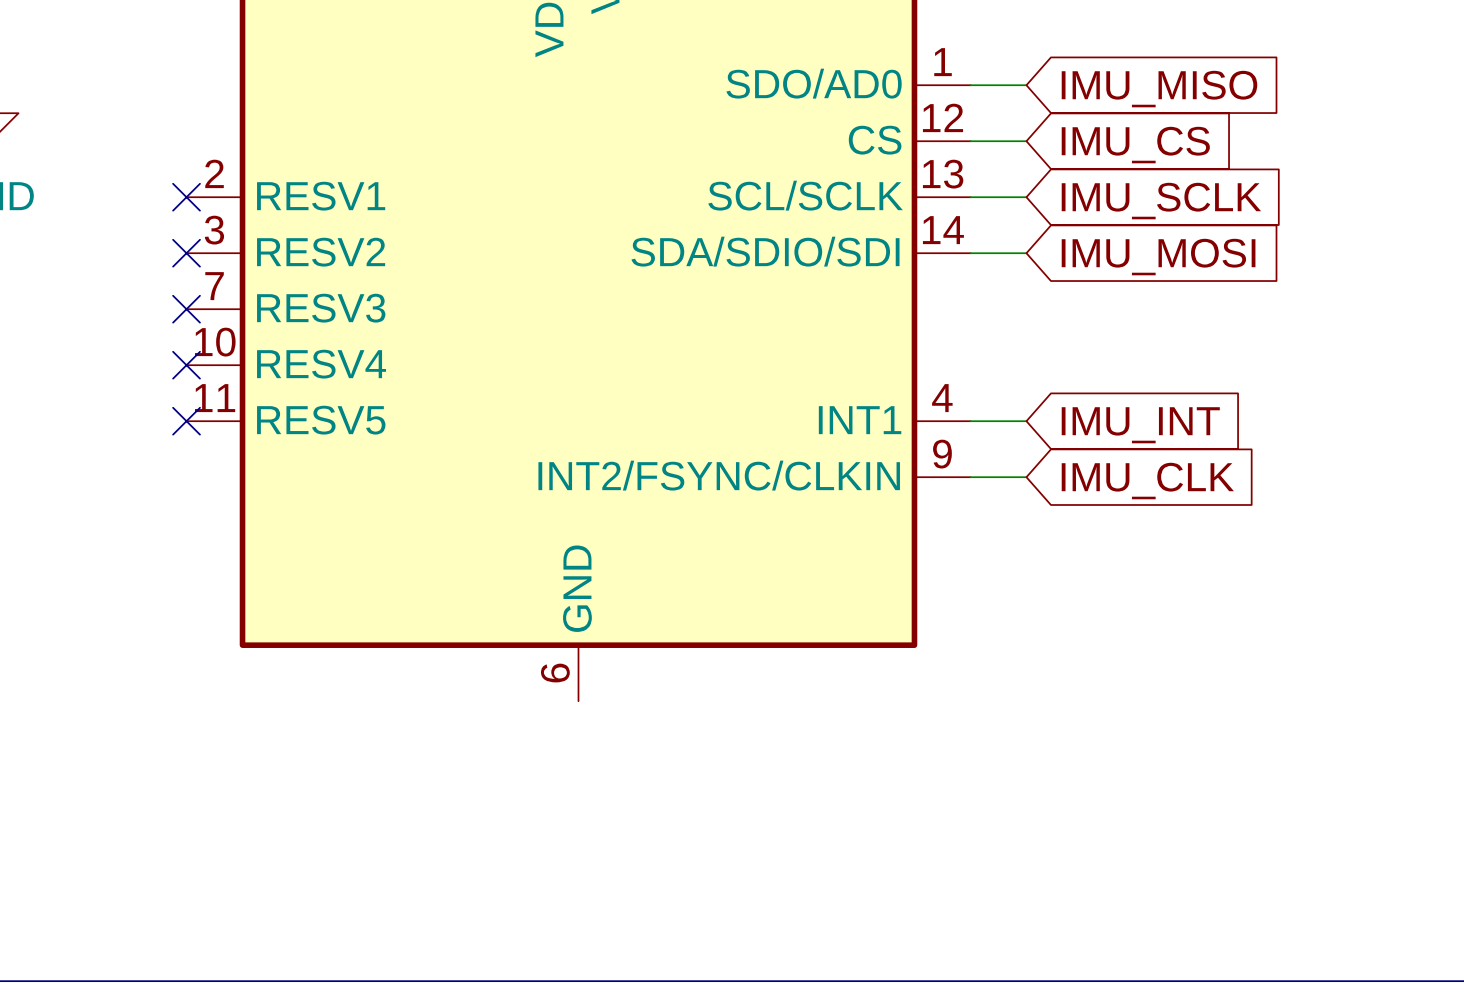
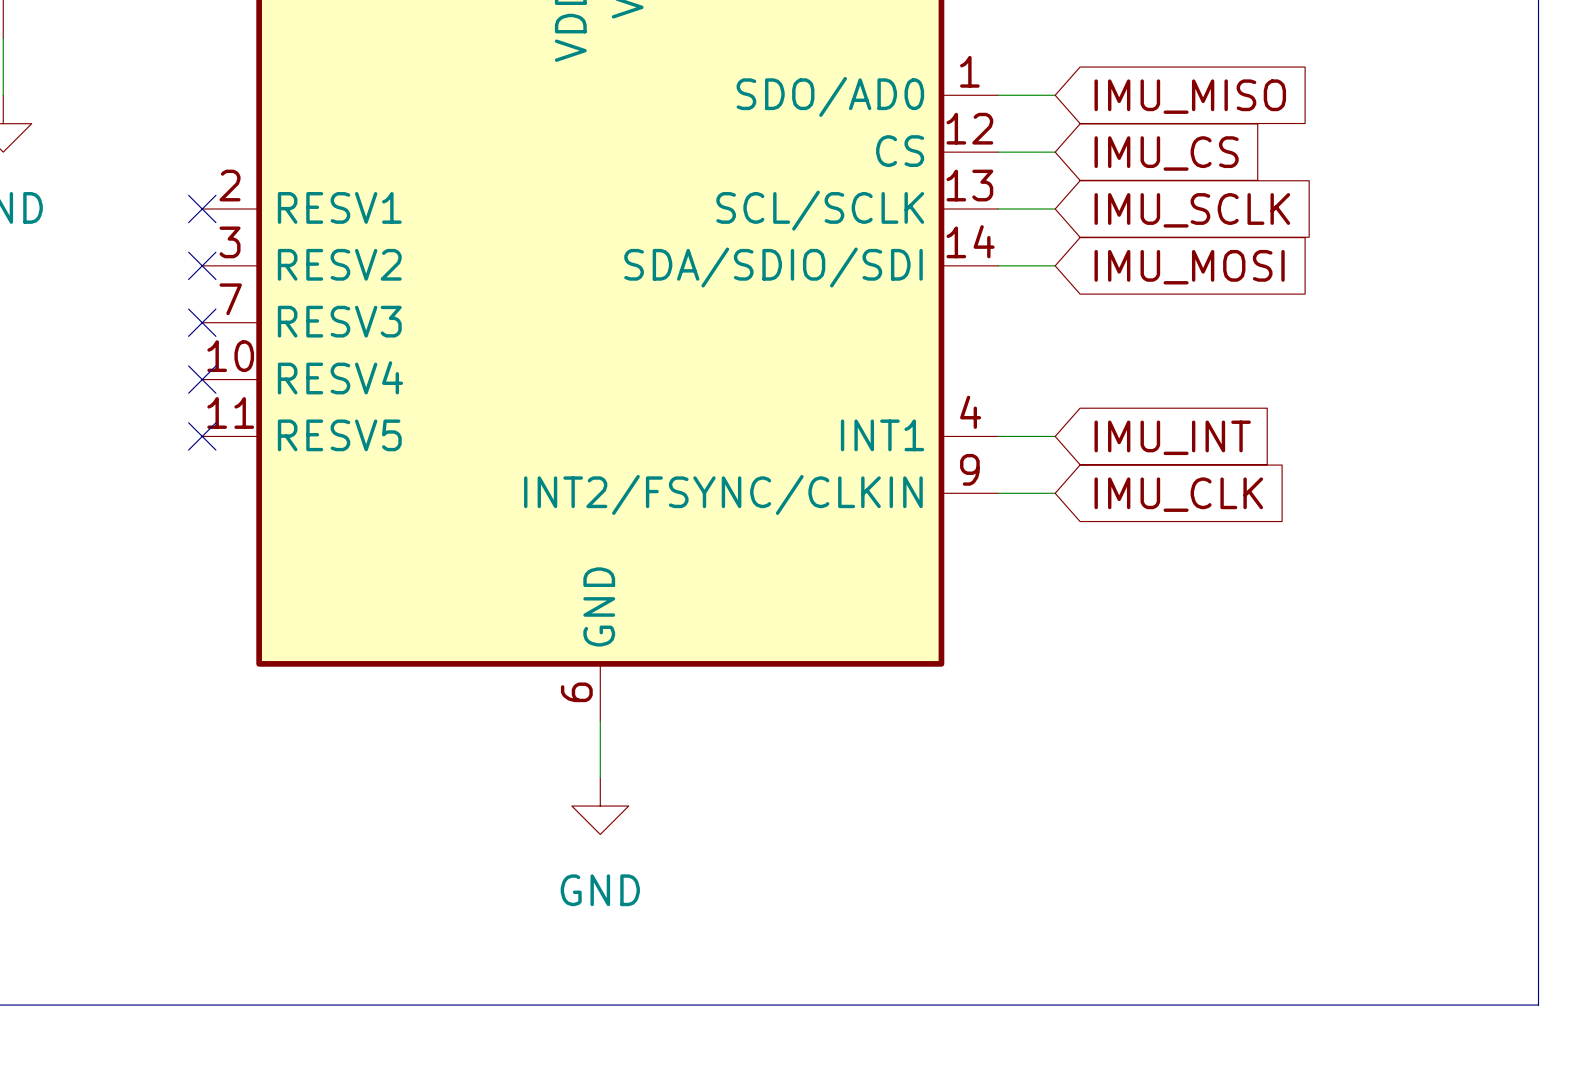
wire: none -> (600, 720) (600, 777)
power symbol: none -> GND (600, 806)

